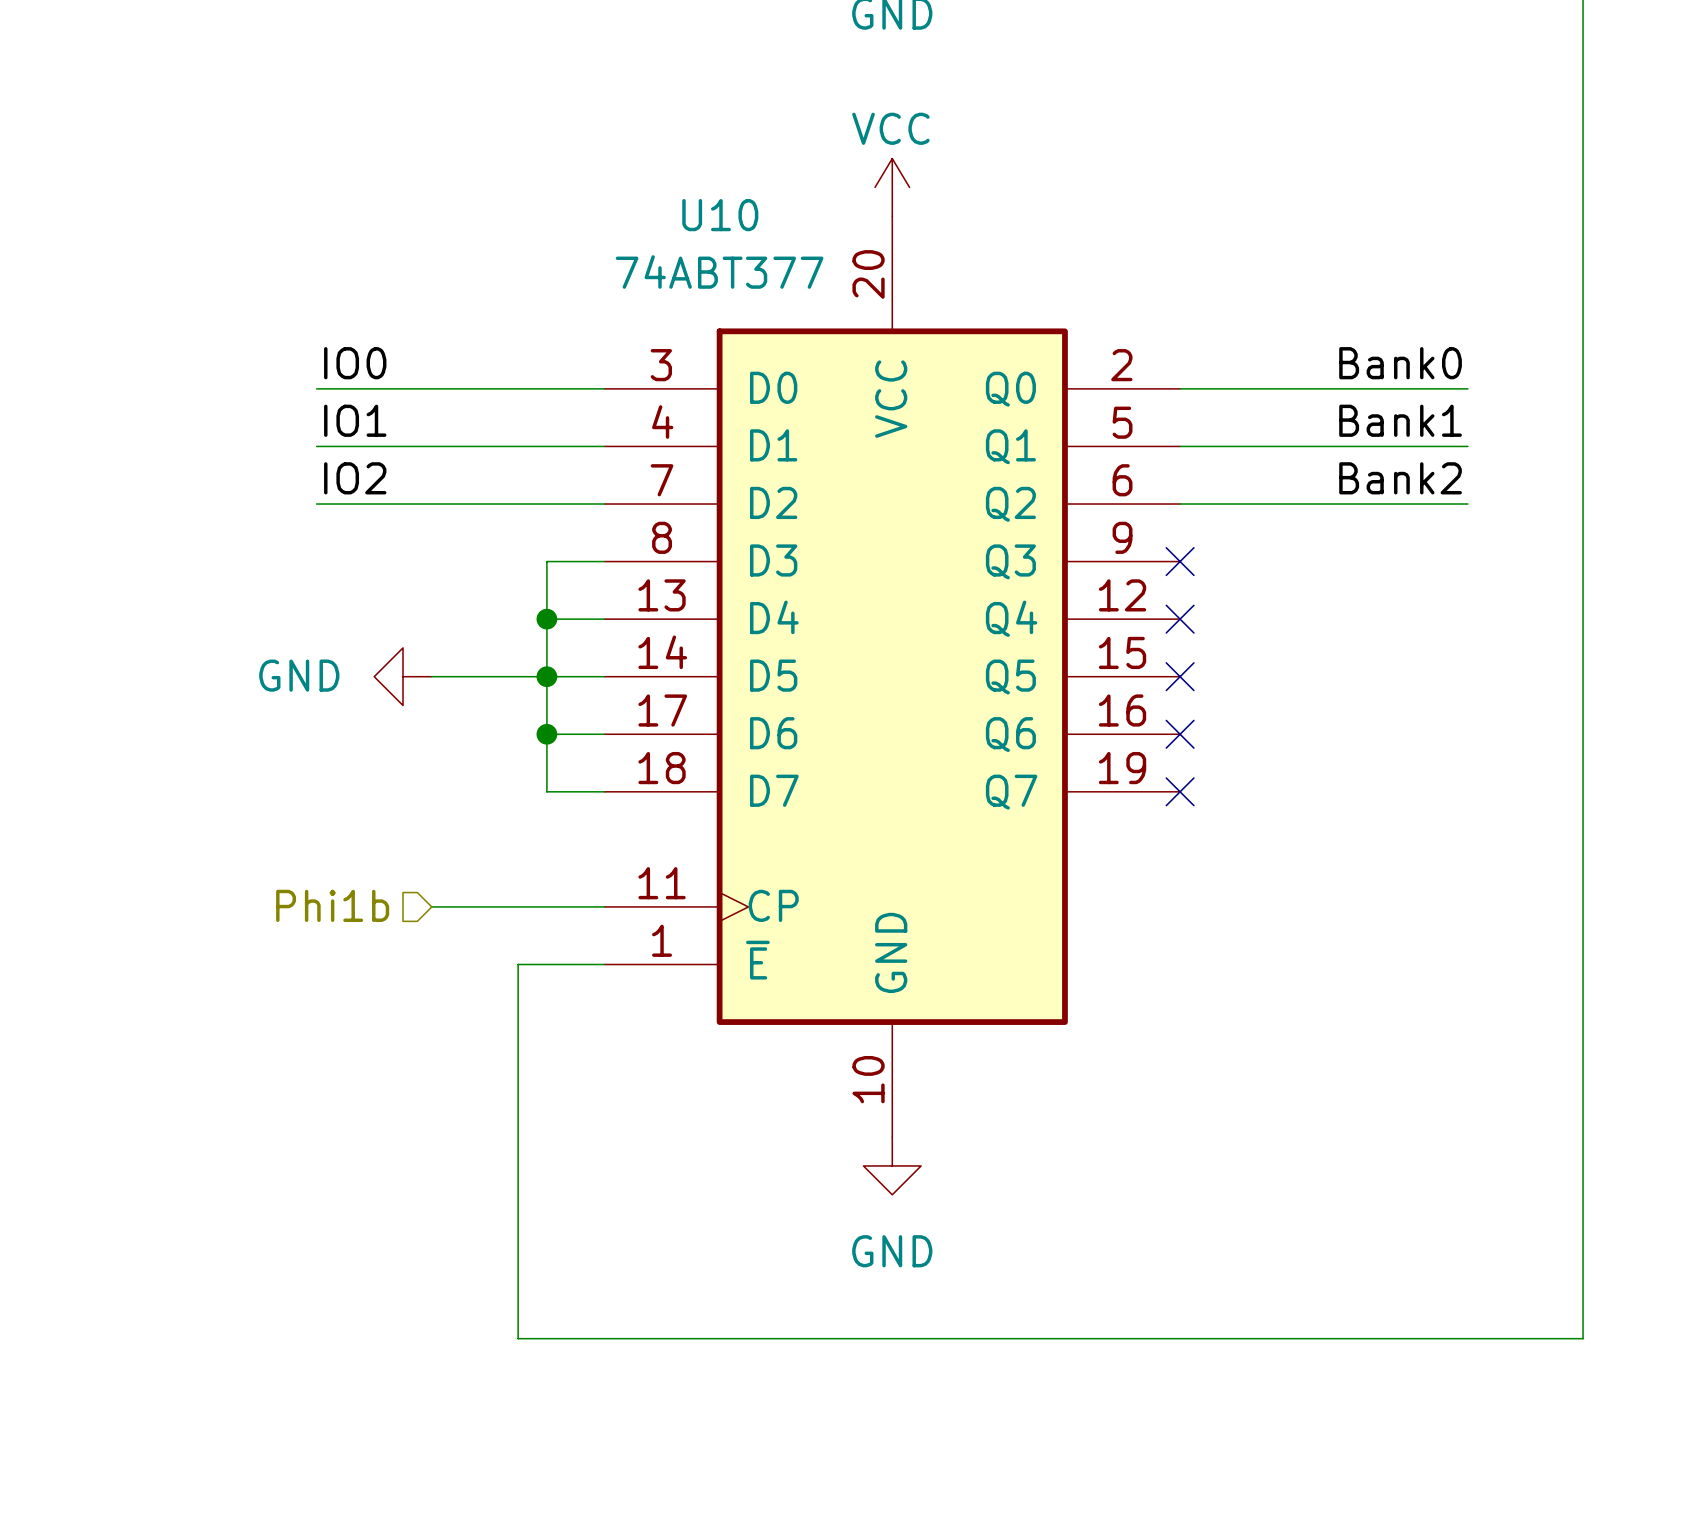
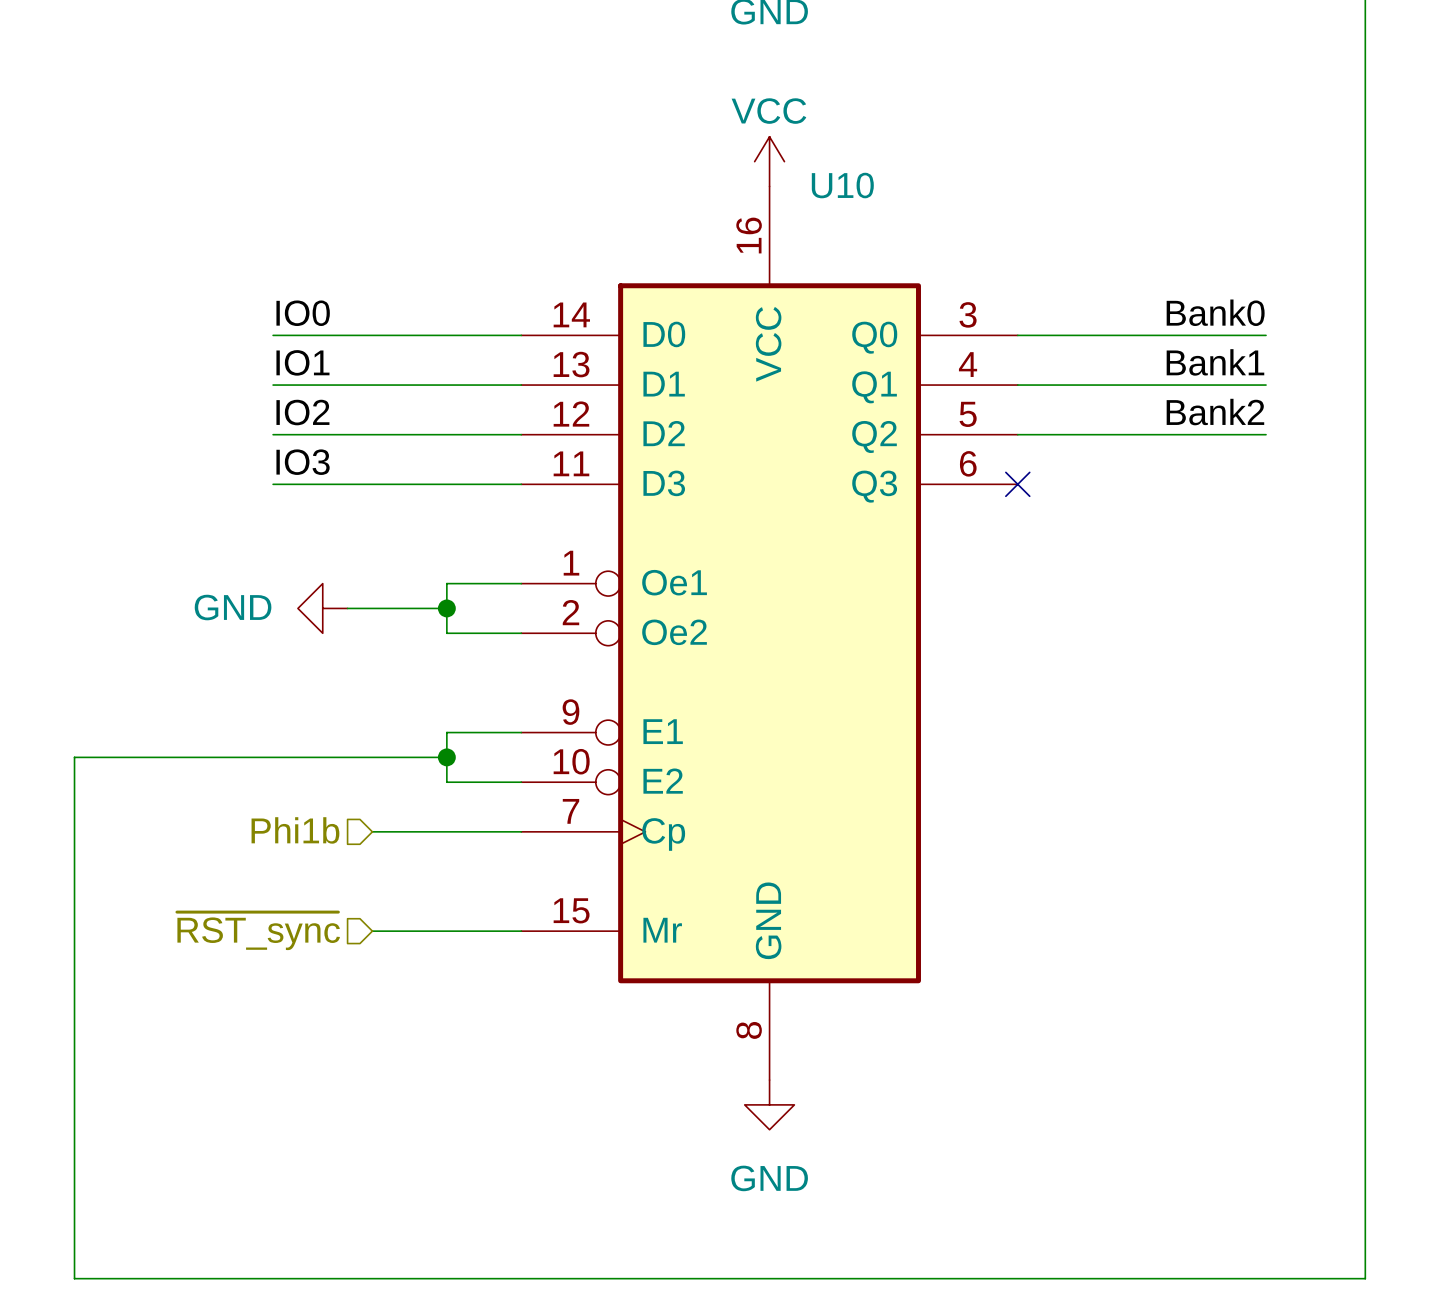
U10 name position: U10 (720, 215) -> U10 (842, 185)
U10 symbol: [604, 216, 1181, 1138] -> [521, 186, 1018, 1081]
U10 value: 74ABT377 (719, 271) -> none
label: none -> IO3 (303, 462)
wire: (546, 561) (546, 791) (604, 791) -> (471, 484) (273, 484)
wire: (546, 619) (604, 619) -> none
junction: (546, 619) -> none
no-connect mark: (1180, 619) -> none
power symbol position: GND (403, 676) -> GND (322, 608)
wire: (431, 676) (518, 676) -> (471, 633) (446, 633) (446, 583)
junction: (546, 676) -> none
no-connect mark: (1180, 676) -> none
wire: none -> (347, 608) (446, 608)
junction: none -> (446, 608)
junction: (546, 734) -> none
no-connect mark: (1180, 734) -> none
no-connect mark: (1180, 791) -> none
junction: none -> (446, 757)
hierarchical label position: Phi1b (332, 905) -> Phi1b (295, 830)
wire: (431, 906) (518, 906) -> (521, 732) (446, 732) (446, 782)
wire: none -> (372, 831) (446, 831)
wire: (518, 964) (518, 1338) (1583, 1338) -> (446, 757) (74, 757) (74, 1278) (1365, 1278) (1365, 1154)
wire: none -> (372, 931) (521, 931)
hierarchical label: none -> ~{RST_sync} (258, 931)
power symbol position: GND (892, 1165) -> GND (769, 1104)

